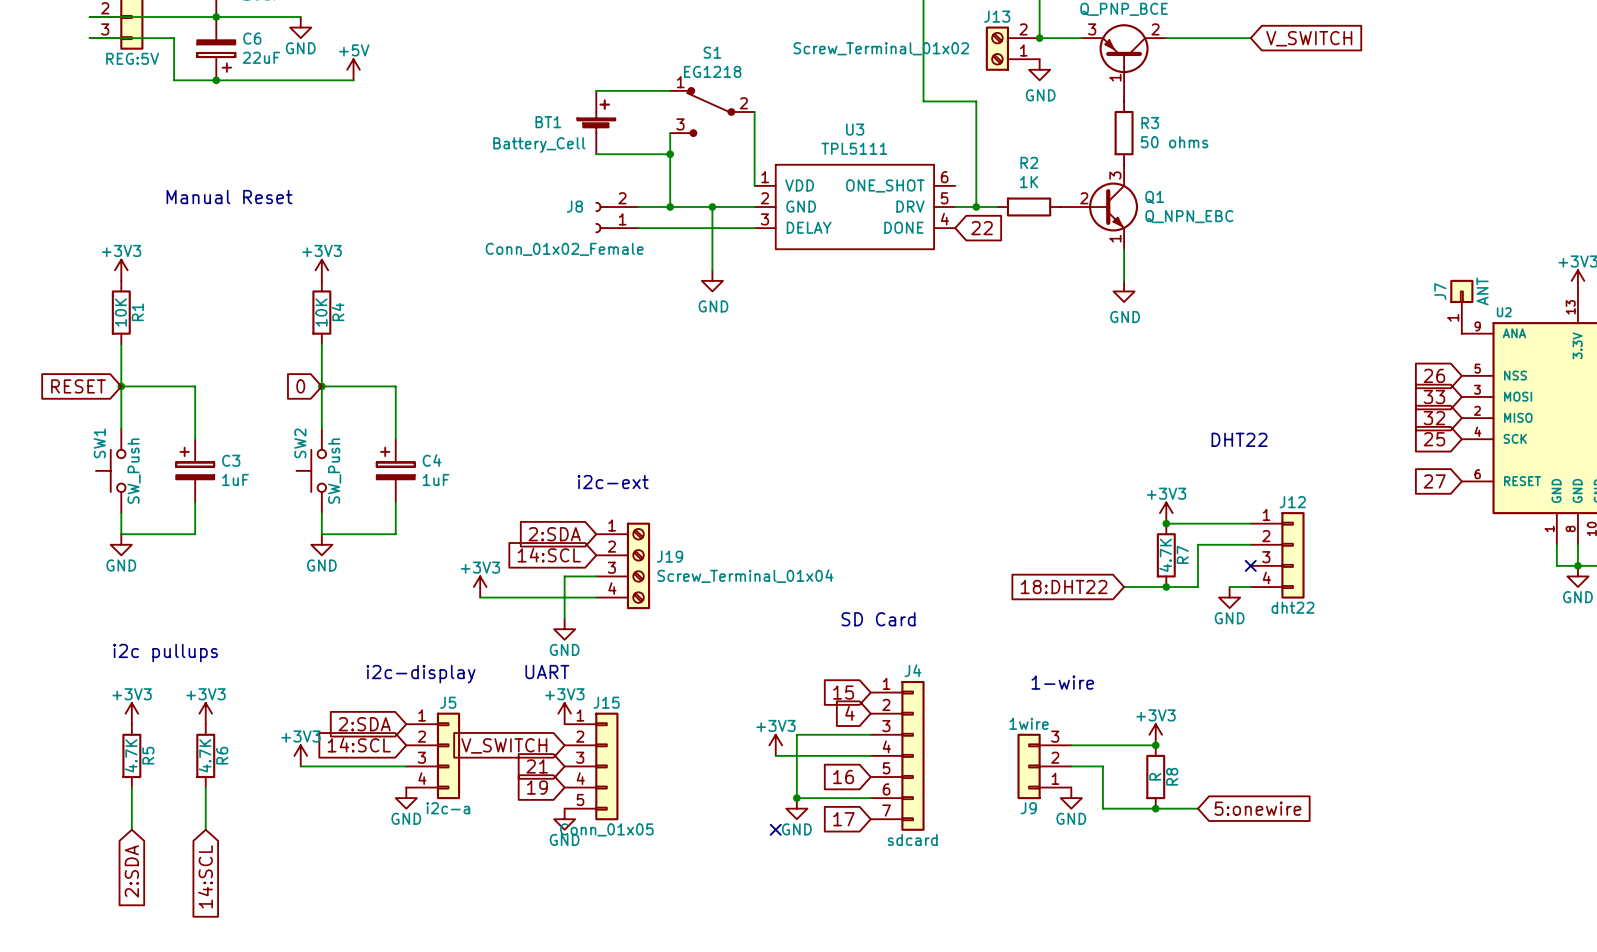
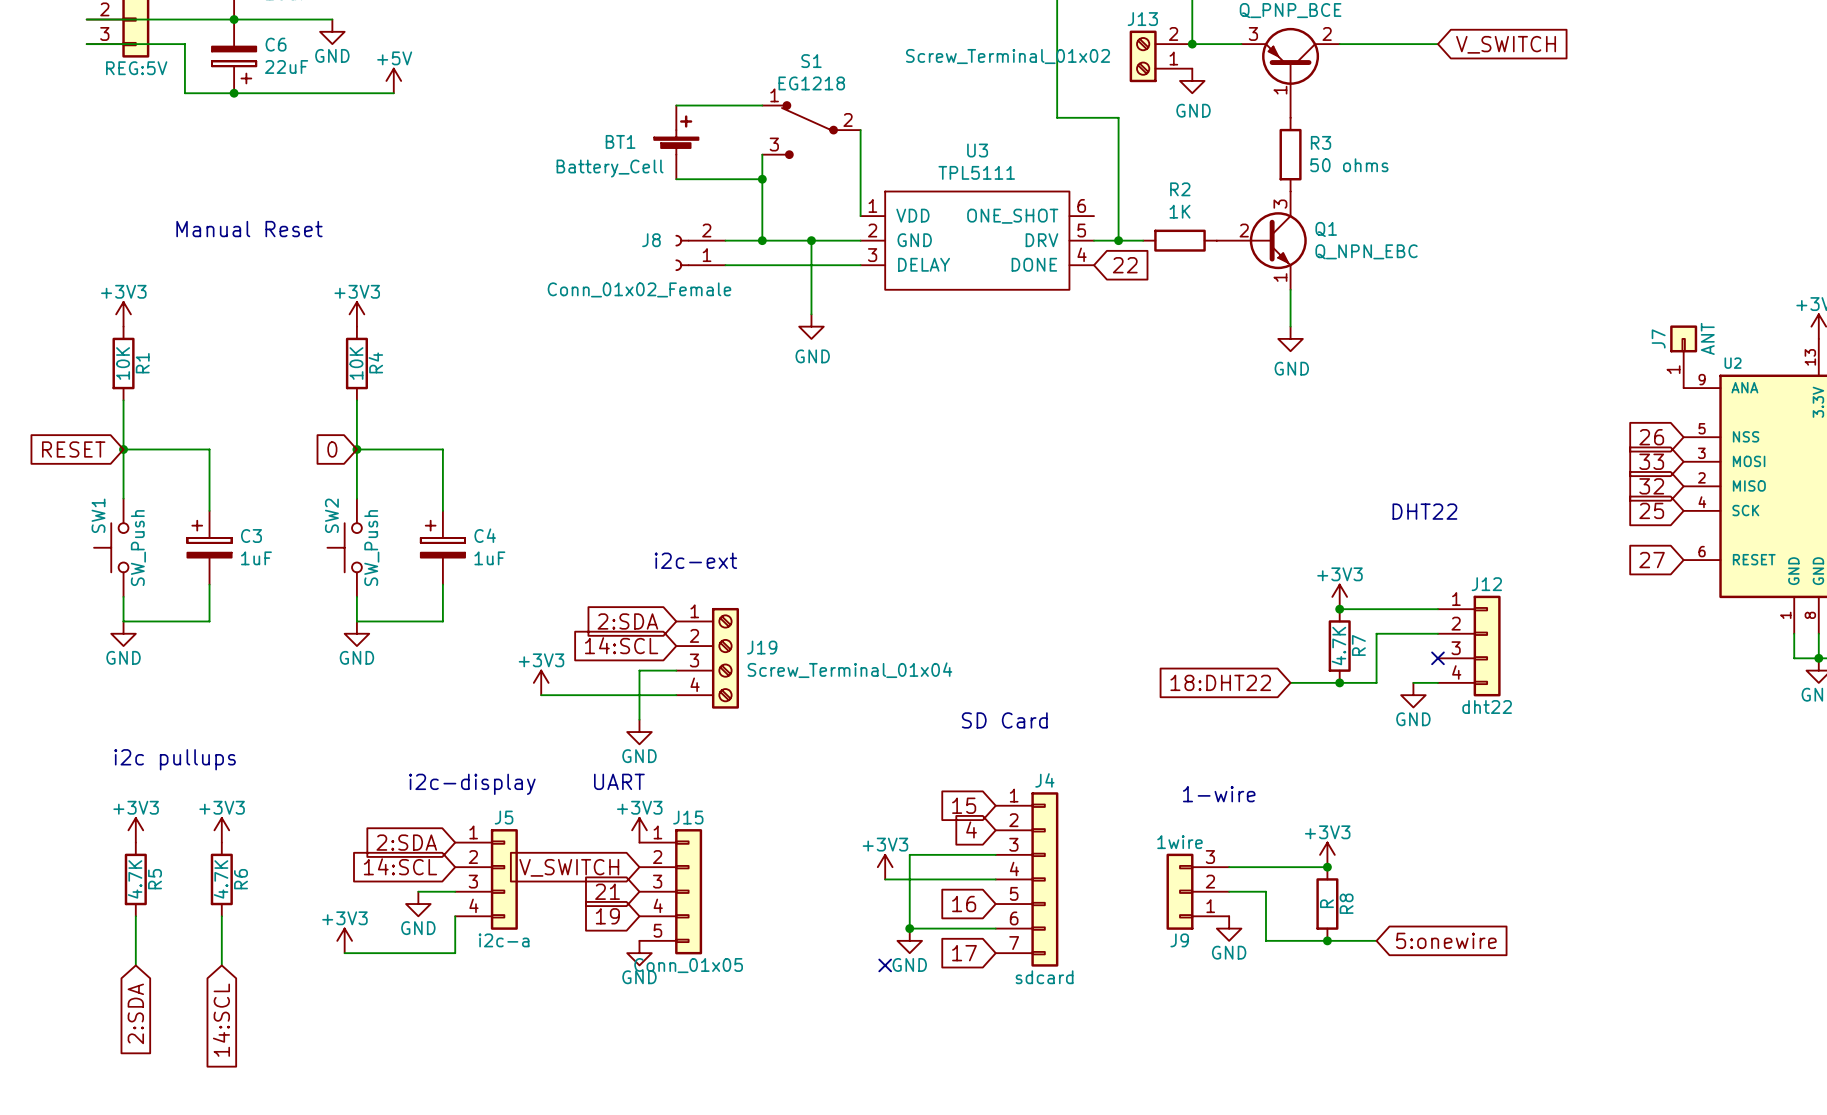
power symbol position: +3V3 (300, 755) -> +3V3 (344, 940)
wire: (300, 766) (374, 766) -> none
wire: none -> (455, 916) (455, 953) (344, 953)
power symbol position: GND (406, 798) -> GND (418, 904)

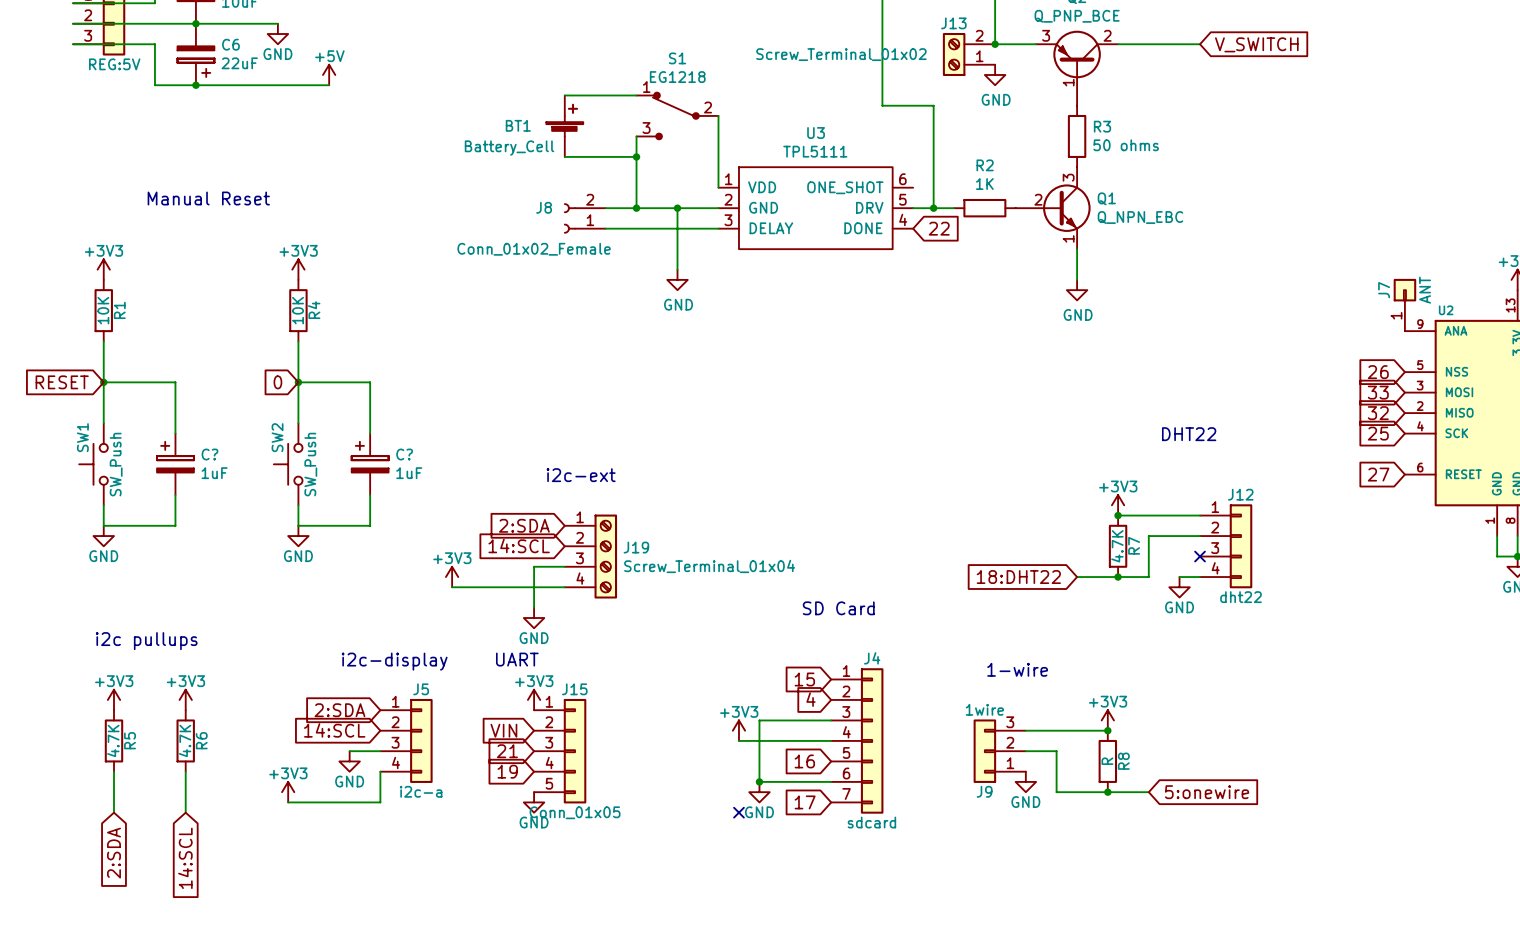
C4 name: C4 (485, 535) -> C? (404, 454)
C3 name: C3 (251, 536) -> C? (209, 454)
global label: V_SWITCH (569, 867) -> VIN (503, 730)

